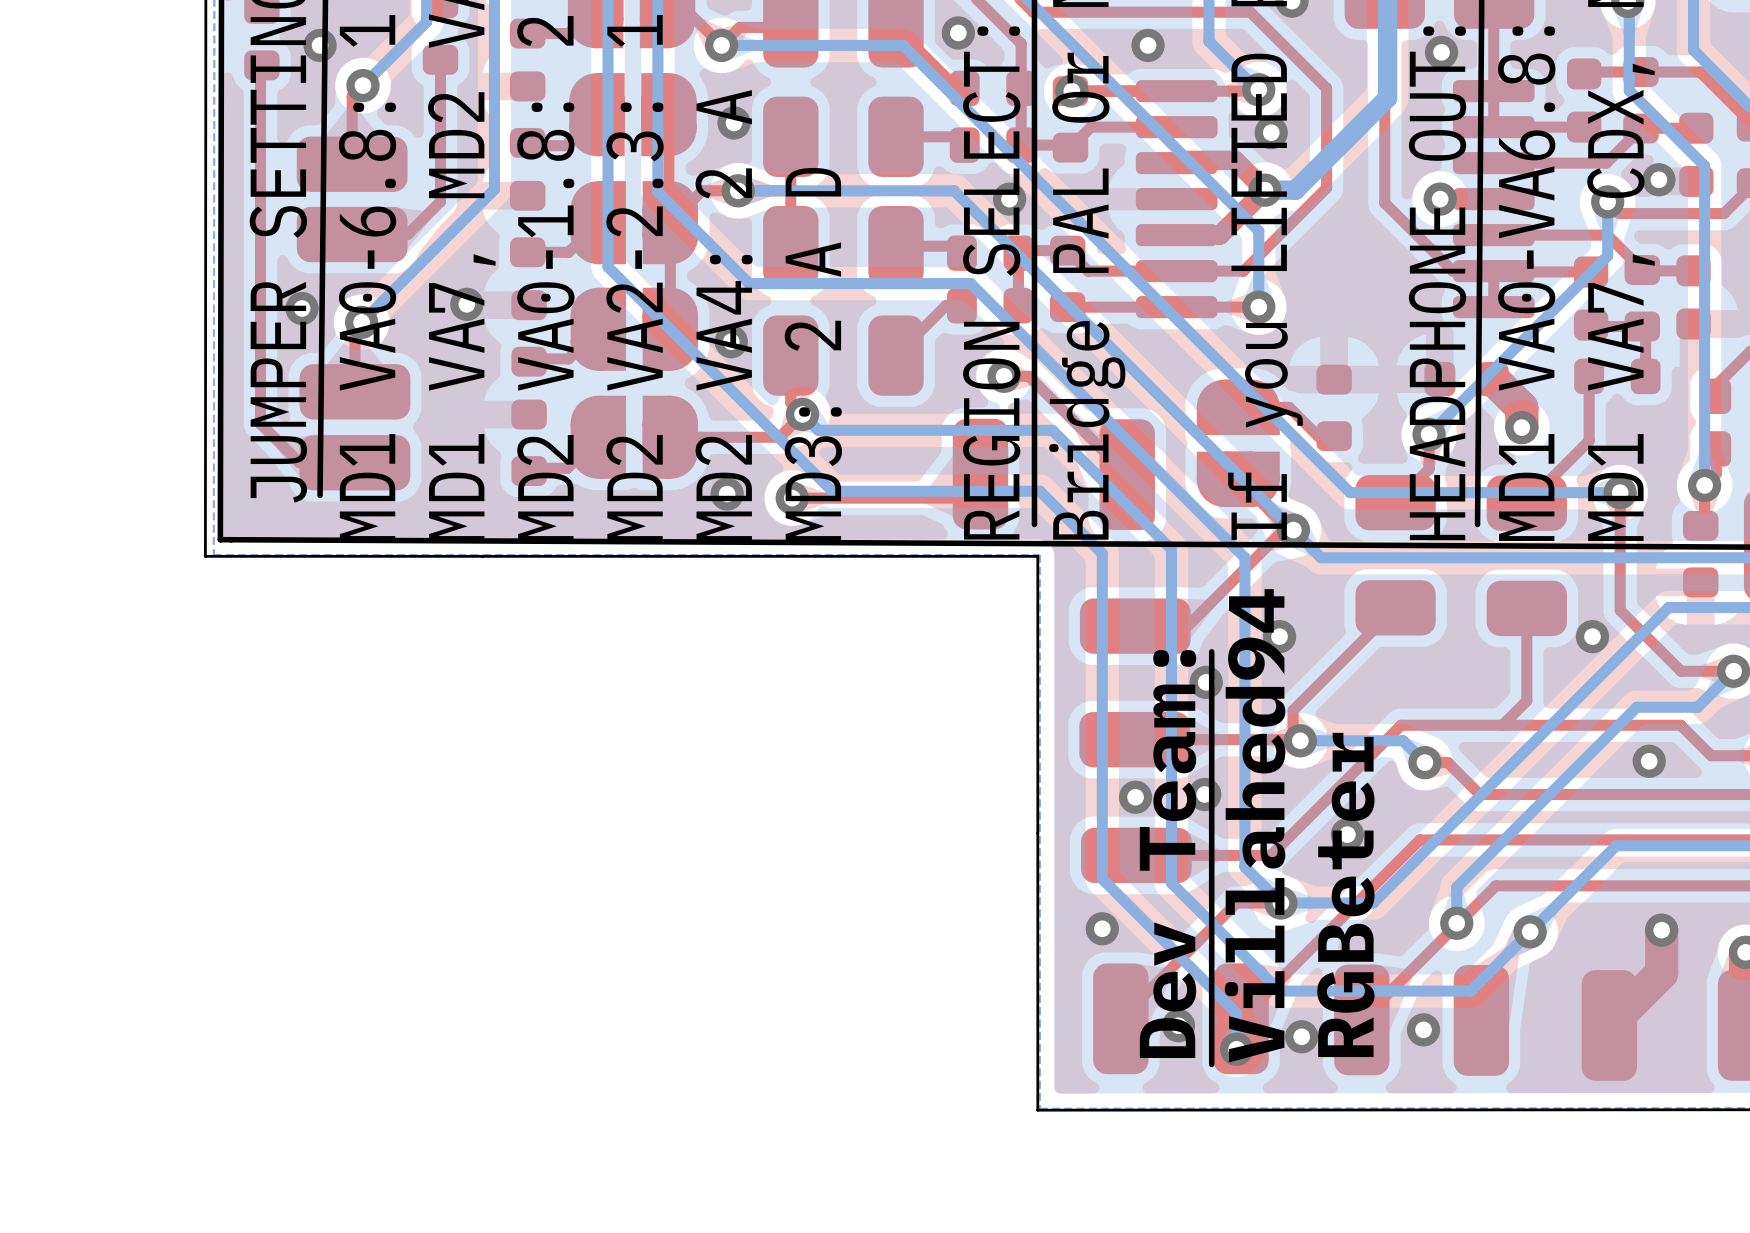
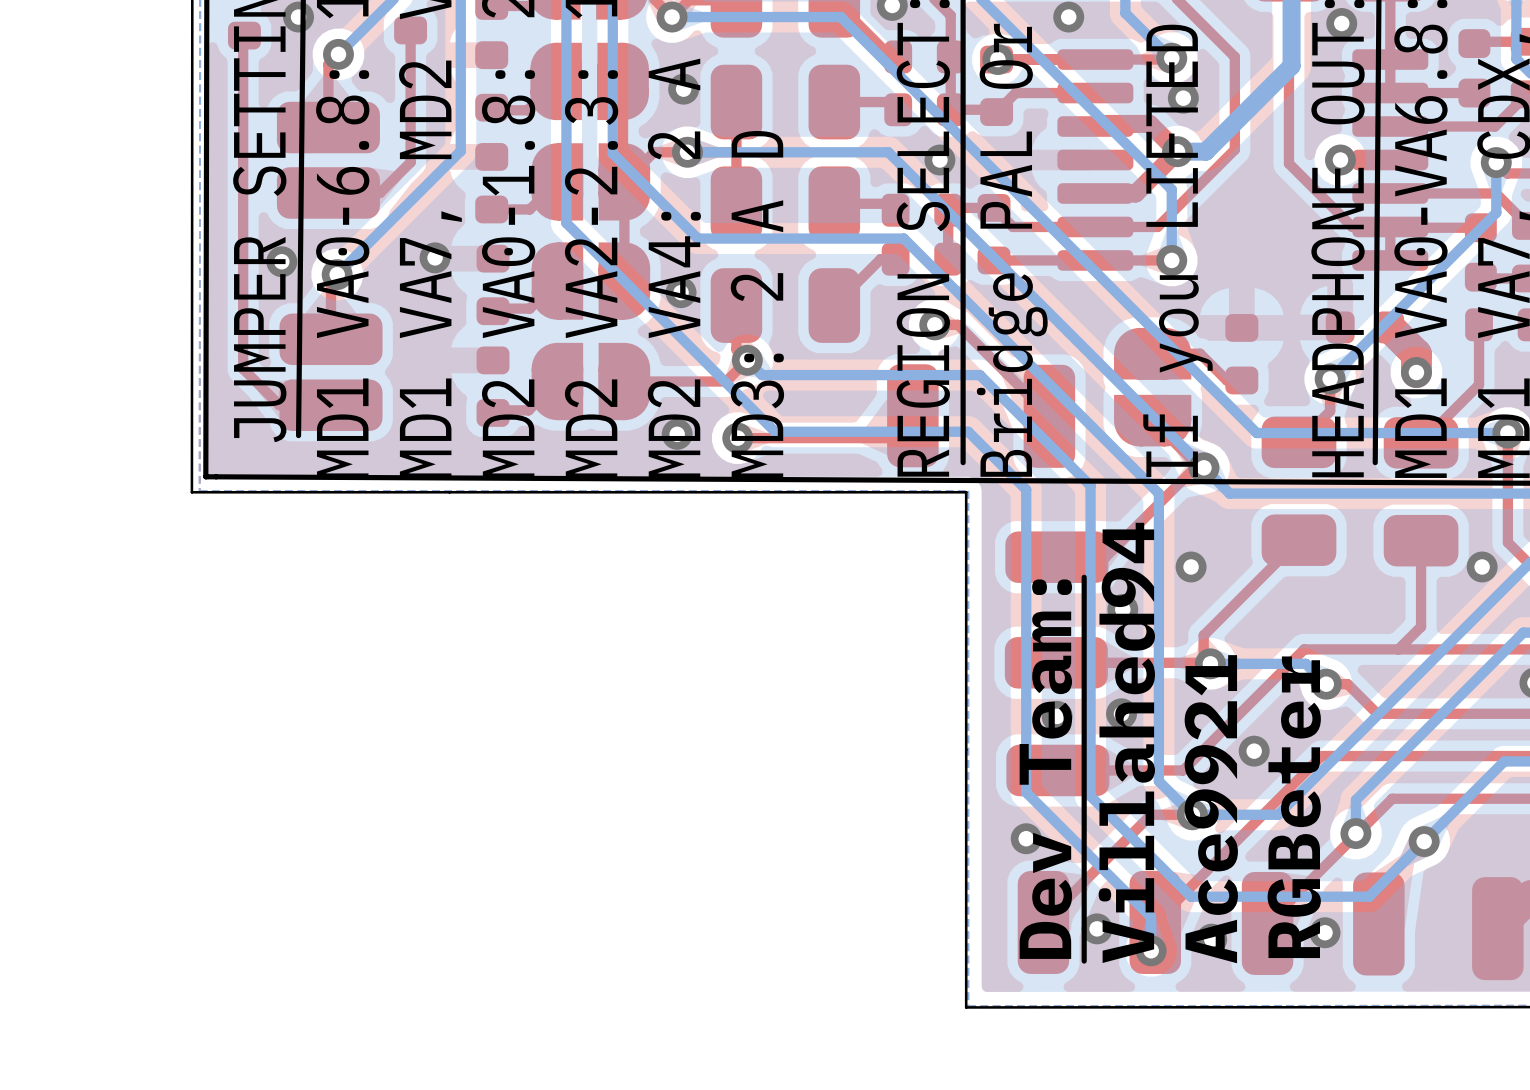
line: (1211, 651) (1211, 1064) -> (1084, 577) (1084, 961)
text position: Villahed94 (1255, 825) -> Villahed94 (1126, 742)
text position: Dev Team: (1168, 854) -> Dev Team: (1045, 769)
text position: RGBeter (1345, 894) -> RGBeter (1294, 807)
text: none -> Ace9921 (1211, 809)

